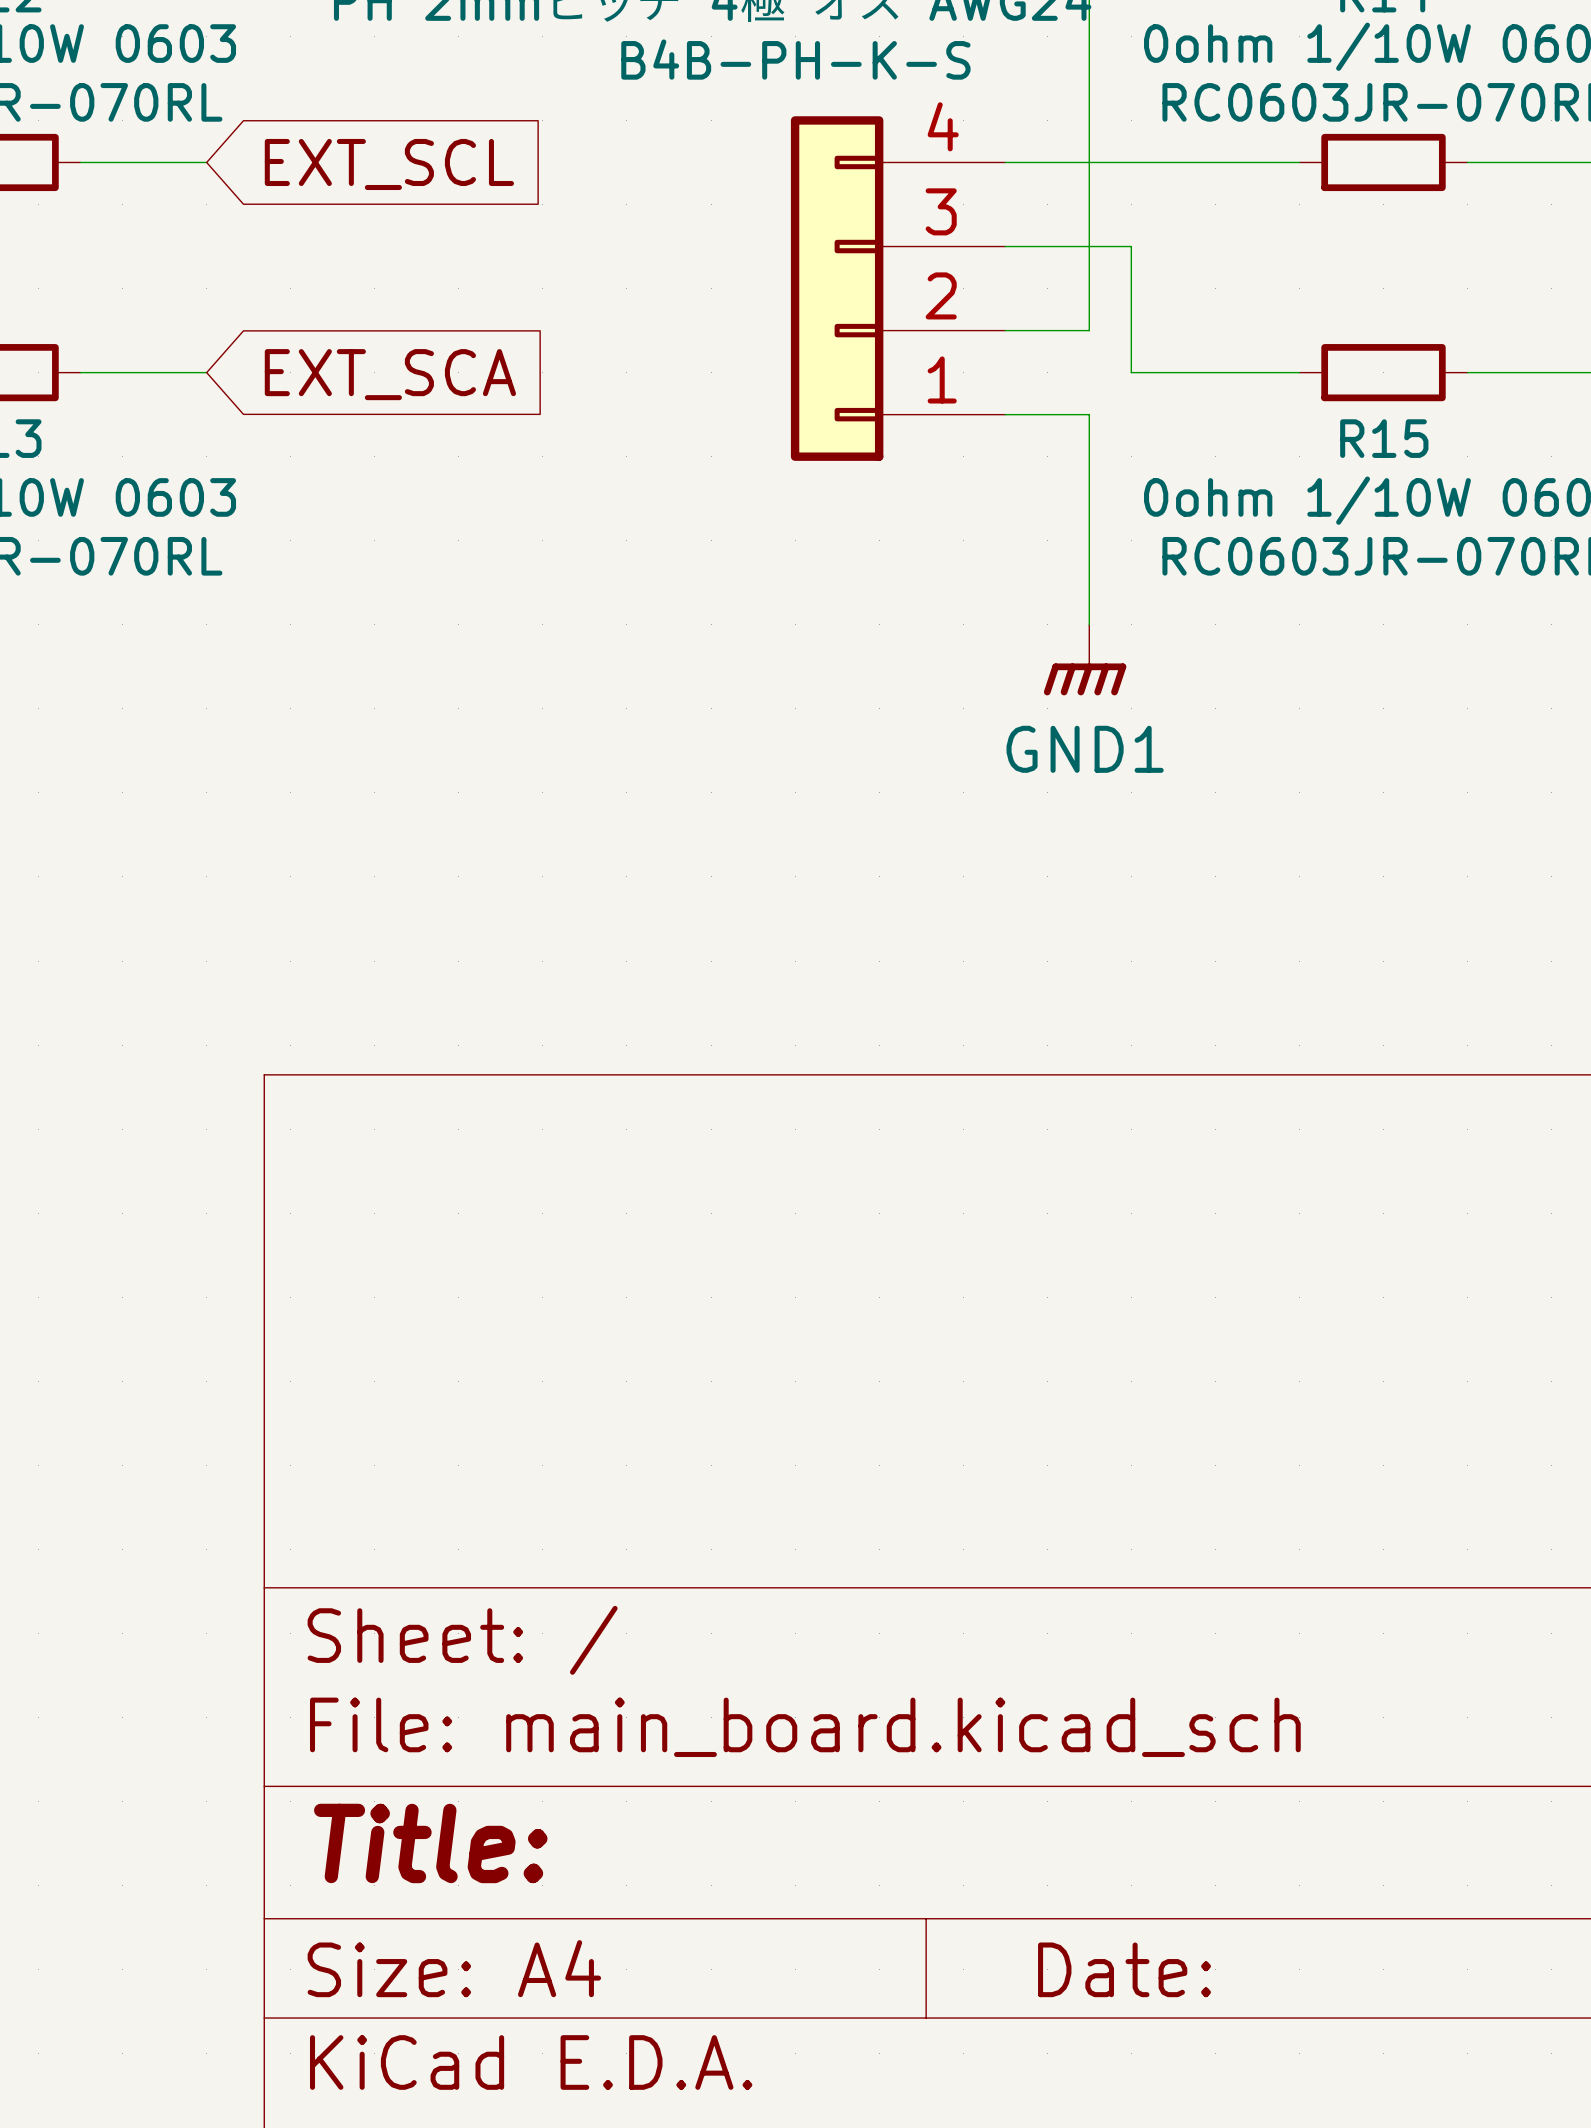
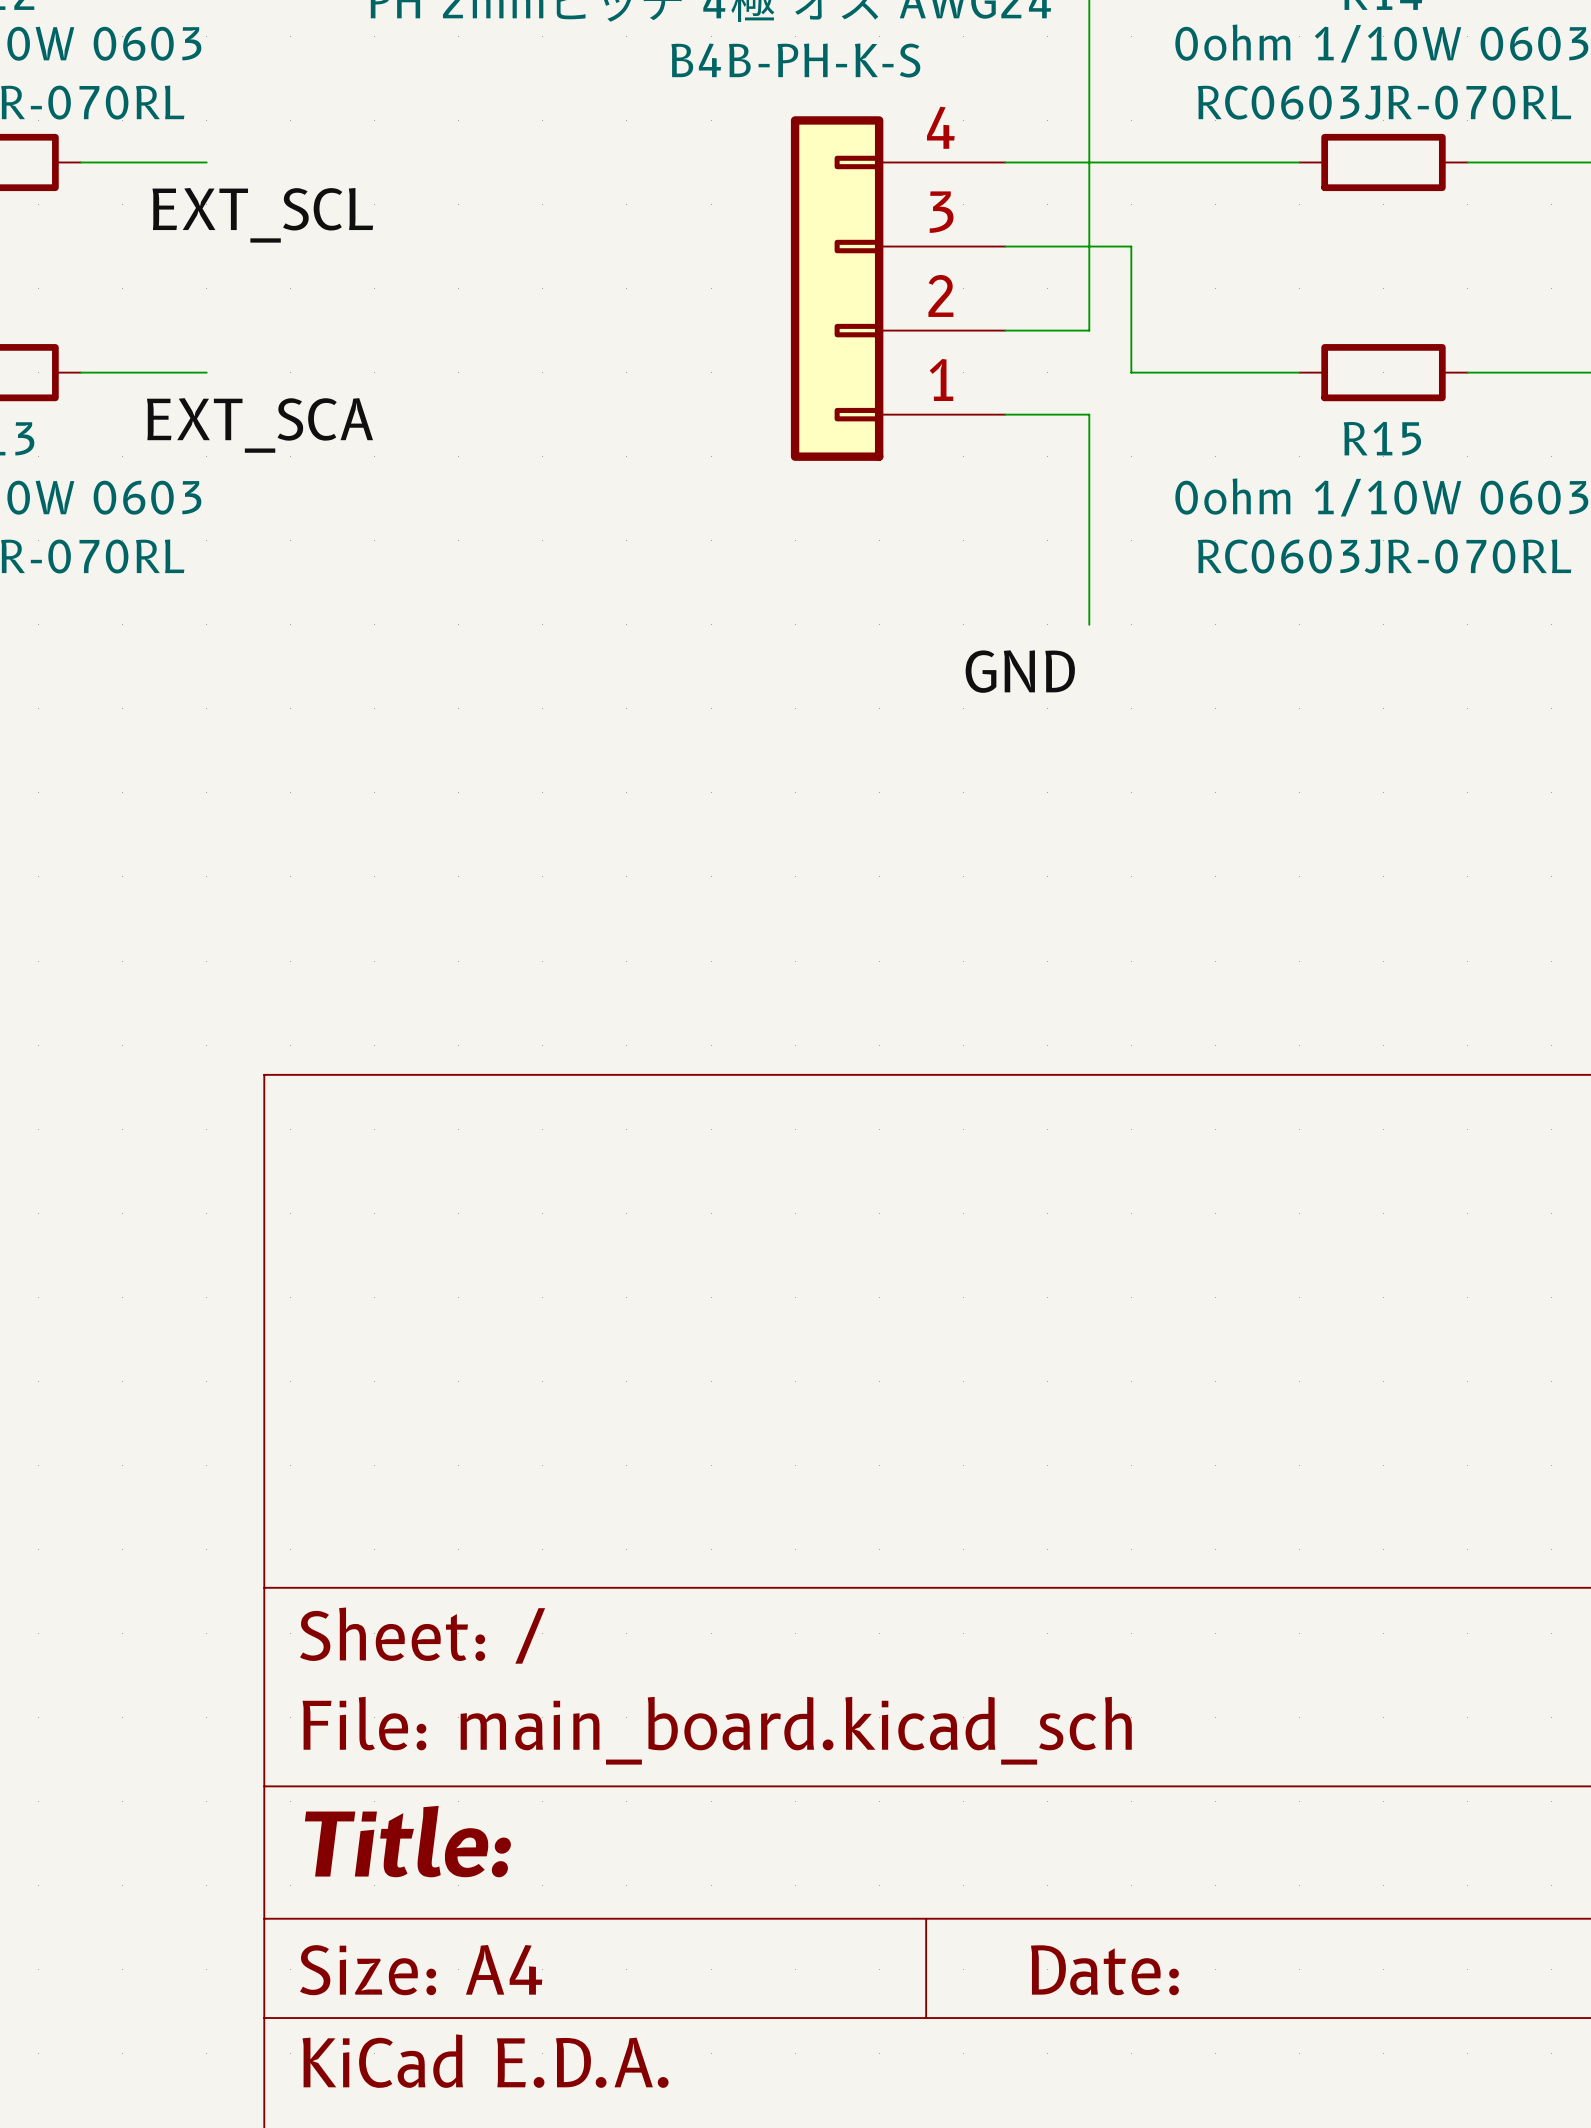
global label: EXT_SCL (389, 164) -> none
label: none -> EXT_SCL (262, 215)
global label: EXT_SCA (390, 374) -> none
label: none -> EXT_SCA (259, 425)
power symbol: GND1 (1085, 660) -> none
label: none -> GND (1020, 671)

